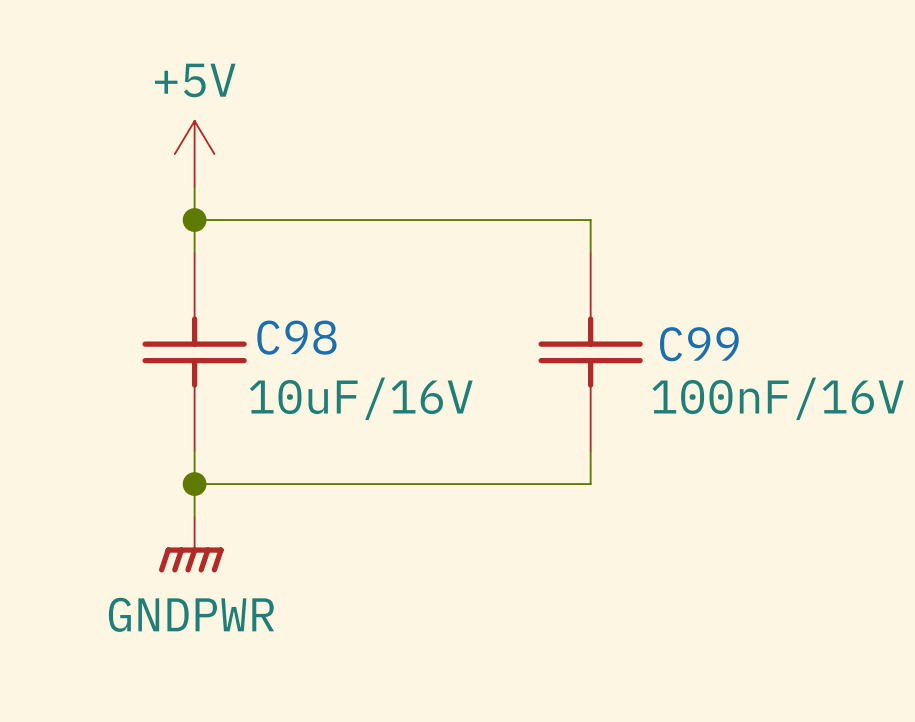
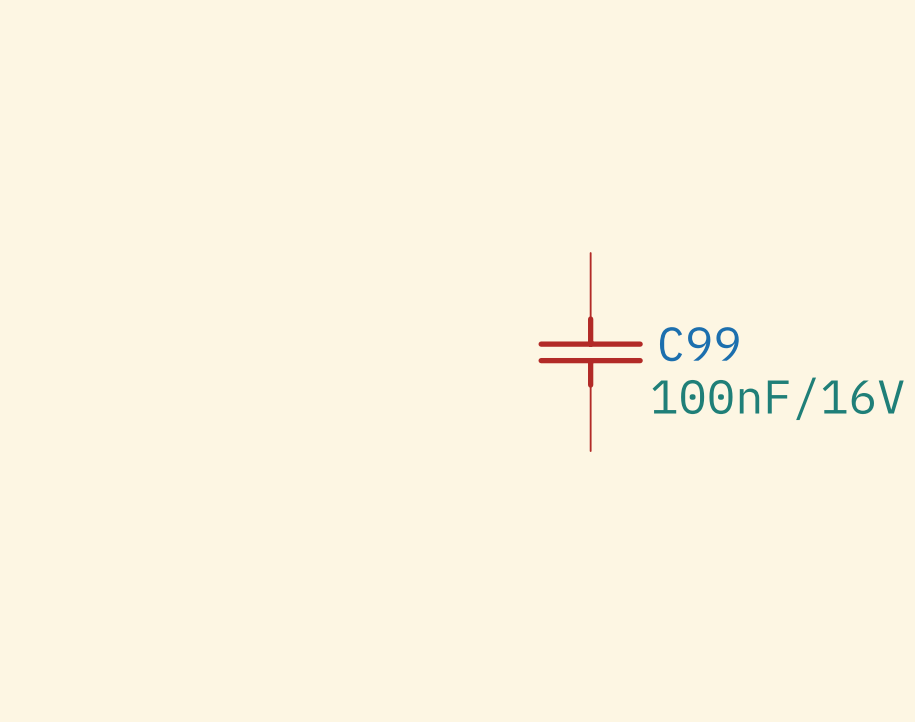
power symbol: +5V (194, 154) -> none
wire: (194, 187) (194, 253) -> none
wire: (194, 220) (590, 220) (590, 253) -> none
junction: (194, 220) -> none
C98: 10uF/16V (194, 352) -> none
wire: (194, 451) (194, 517) -> none
wire: (590, 451) (590, 484) (194, 484) -> none
junction: (194, 484) -> none
power symbol: GNDPWR (191, 544) -> none

